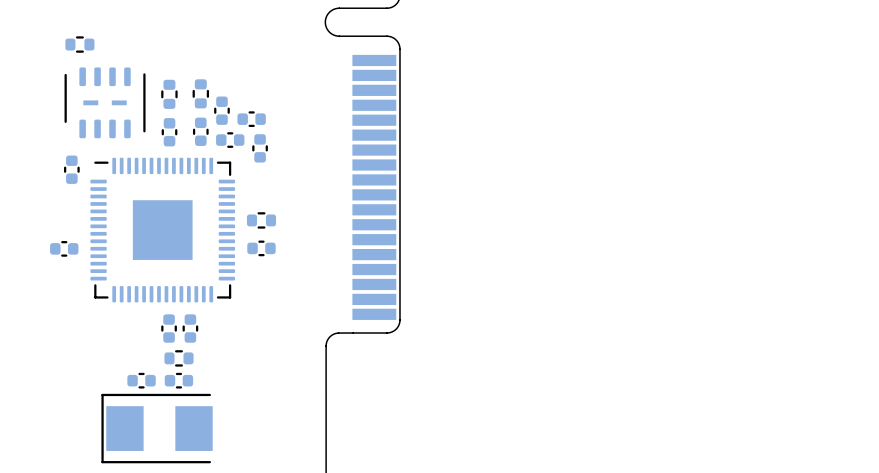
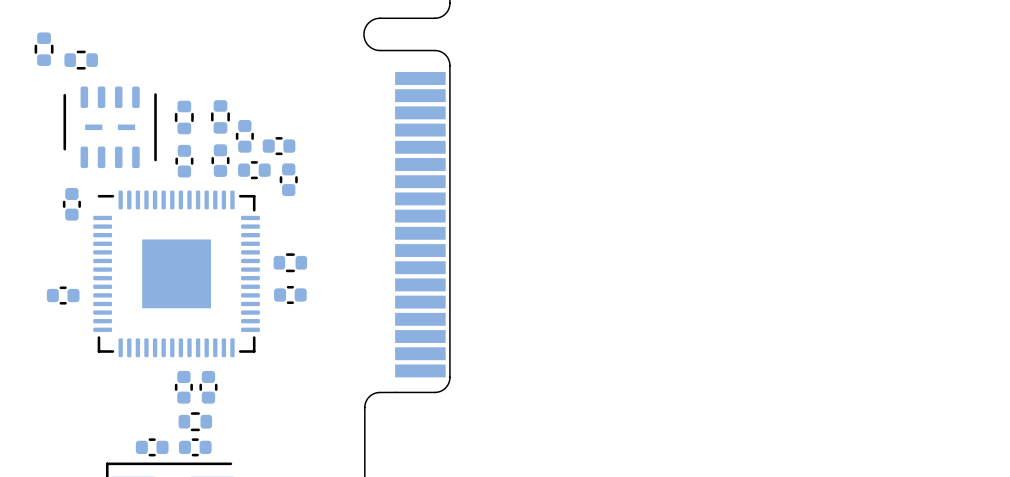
part: none -> (44, 49)

